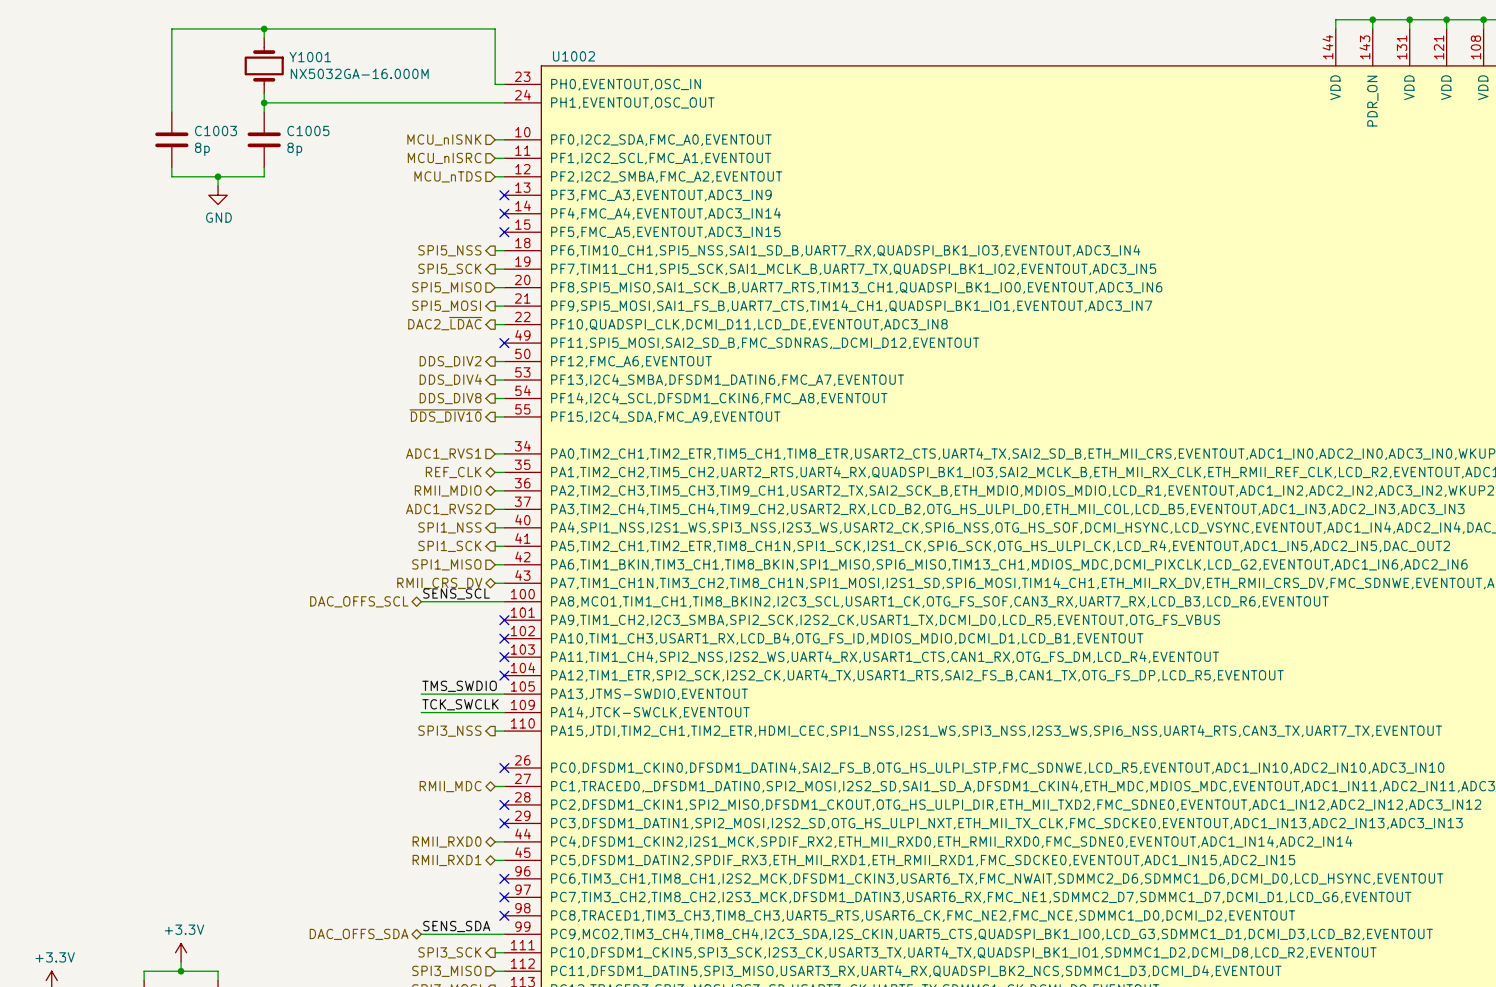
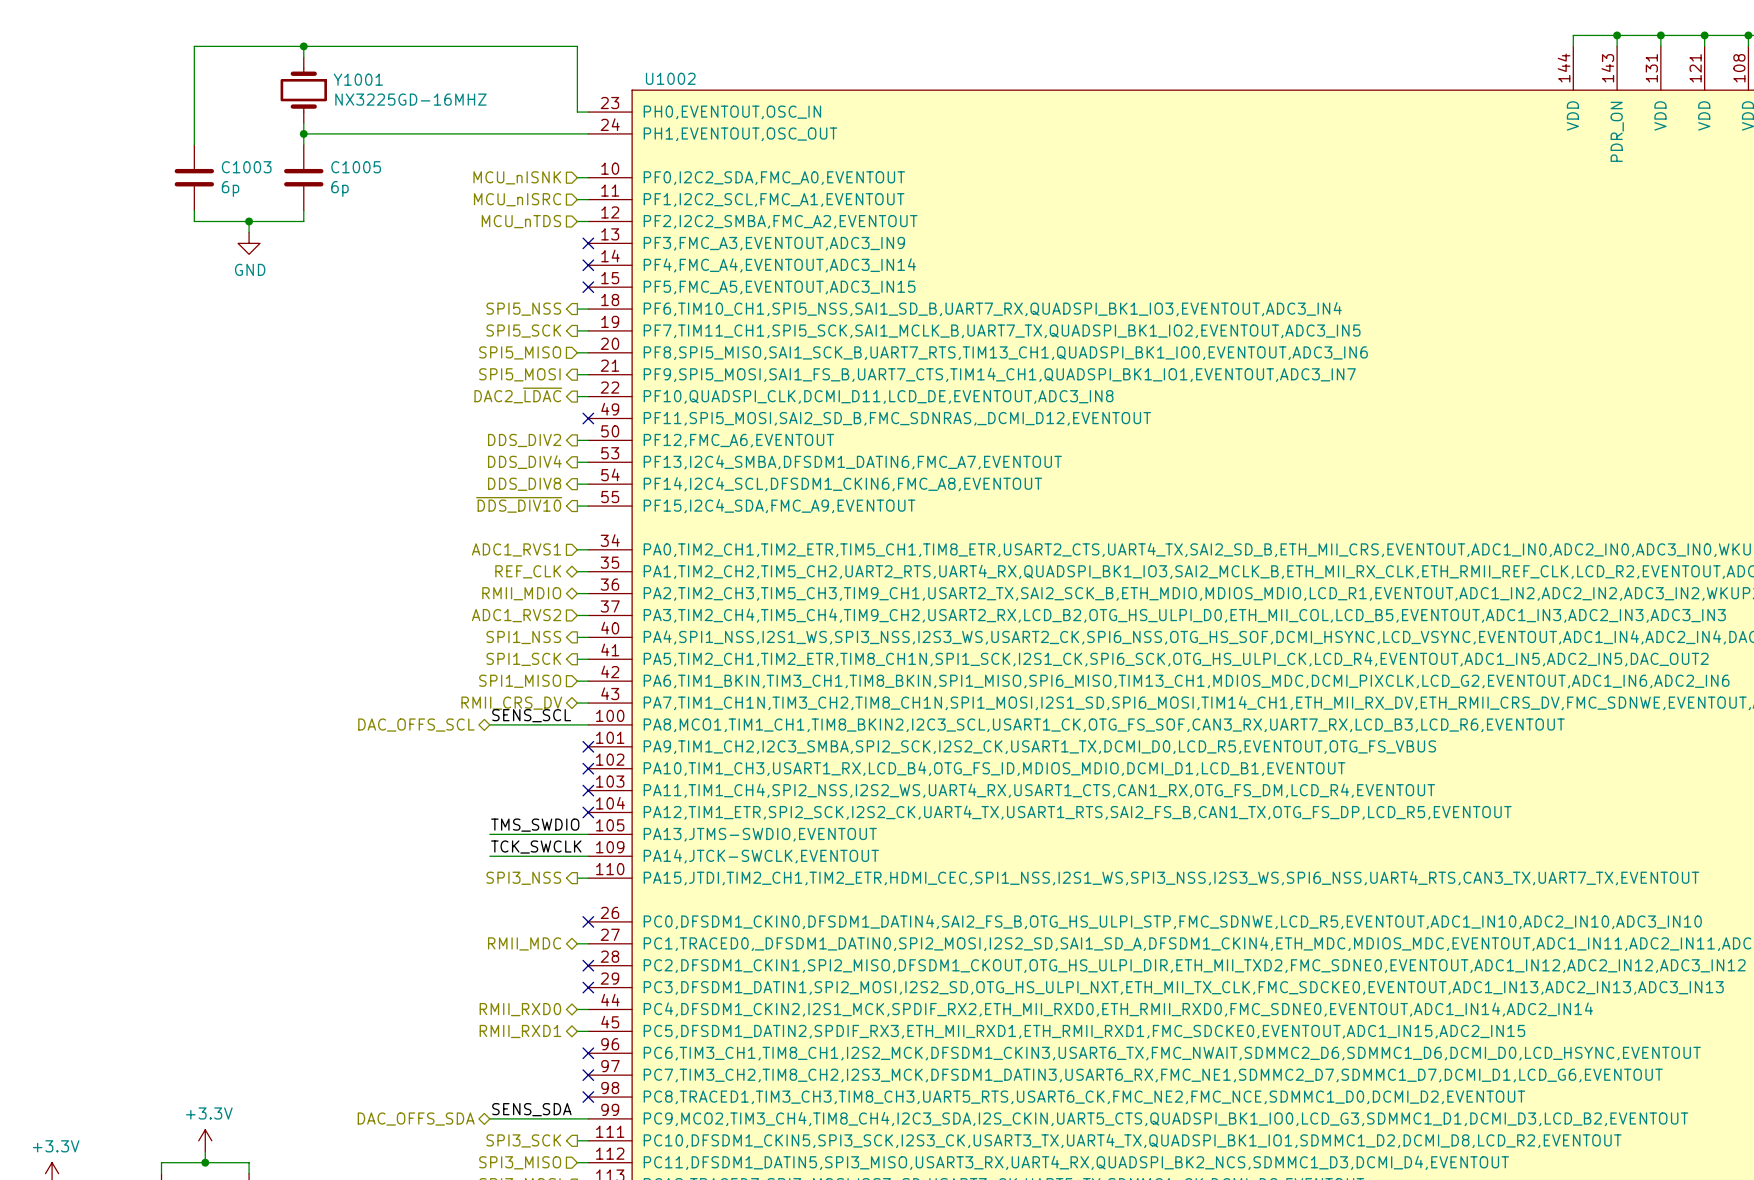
Y1001 value: NX5032GA-16.000M (359, 73) -> NX3225GD-16MHZ (410, 99)
C1003 value: 8p (202, 149) -> 6p (230, 188)
C1005 value: 8p (294, 149) -> 6p (339, 188)

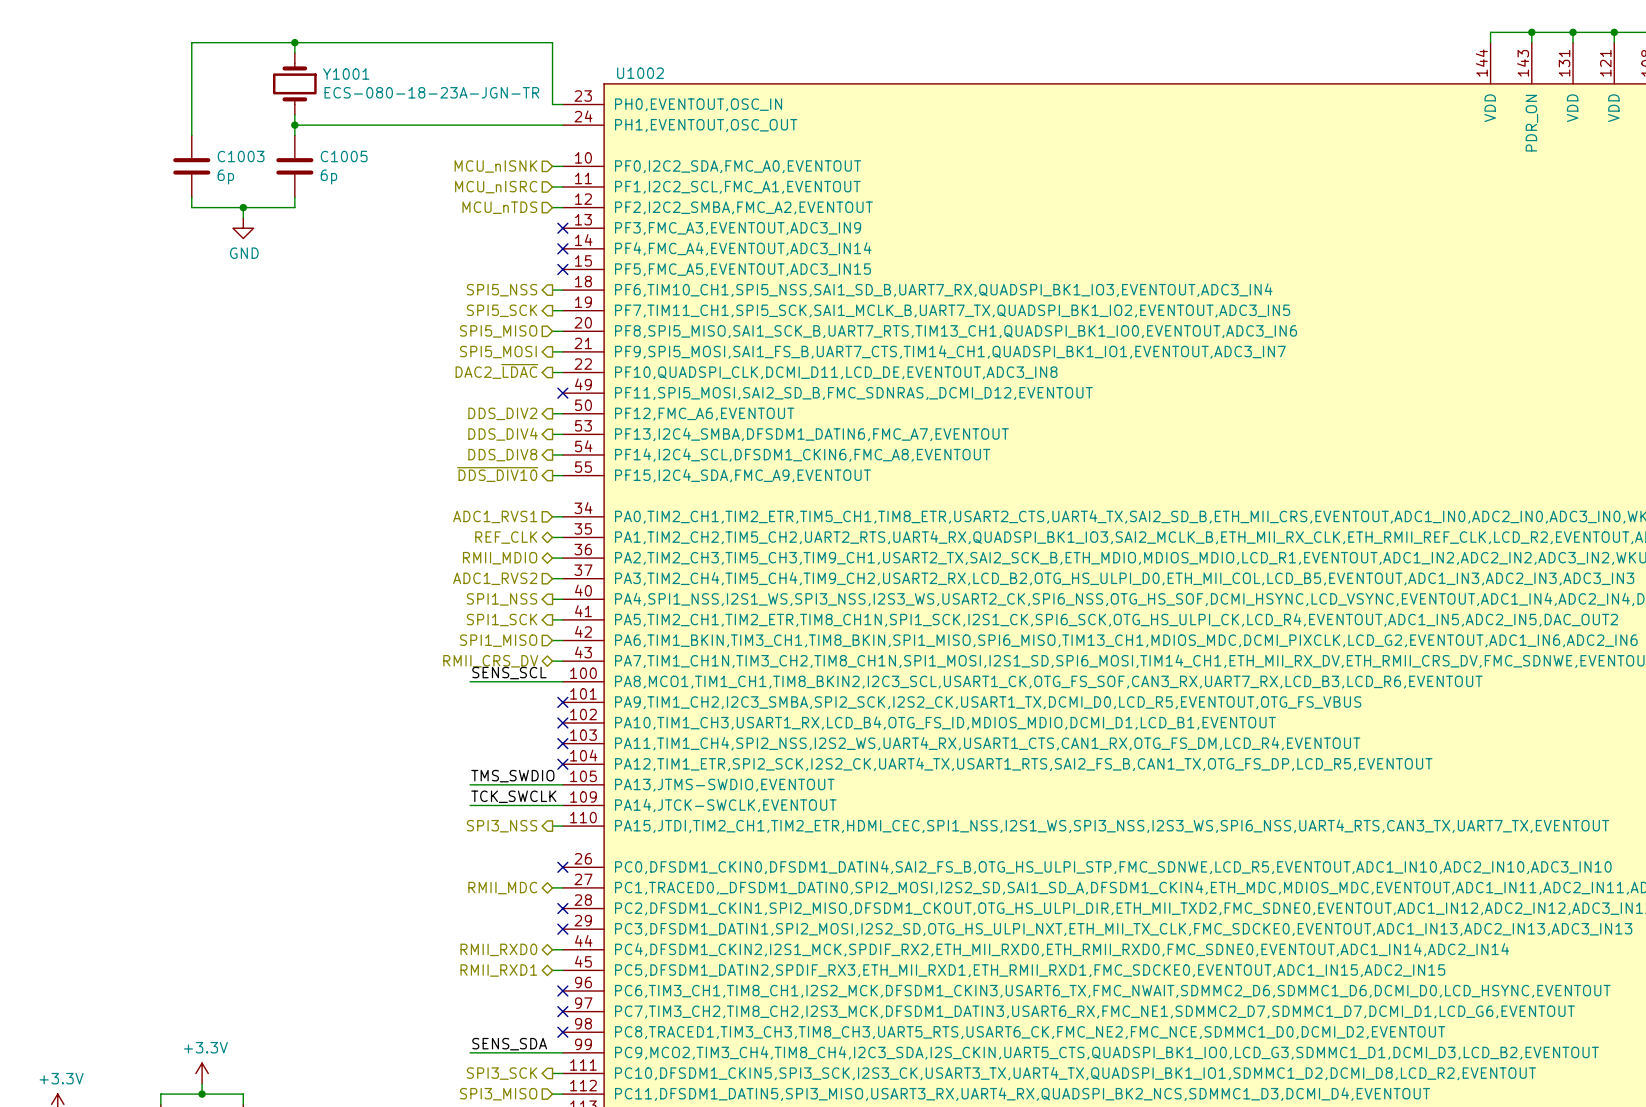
Y1001 value: NX3225GD-16MHZ (410, 99) -> ECS-080-18-23A-JGN-TR (431, 92)
hierarchical label: DAC_OFFS_SCL (416, 725) -> none
hierarchical label: DAC_OFFS_SDA (416, 1119) -> none

